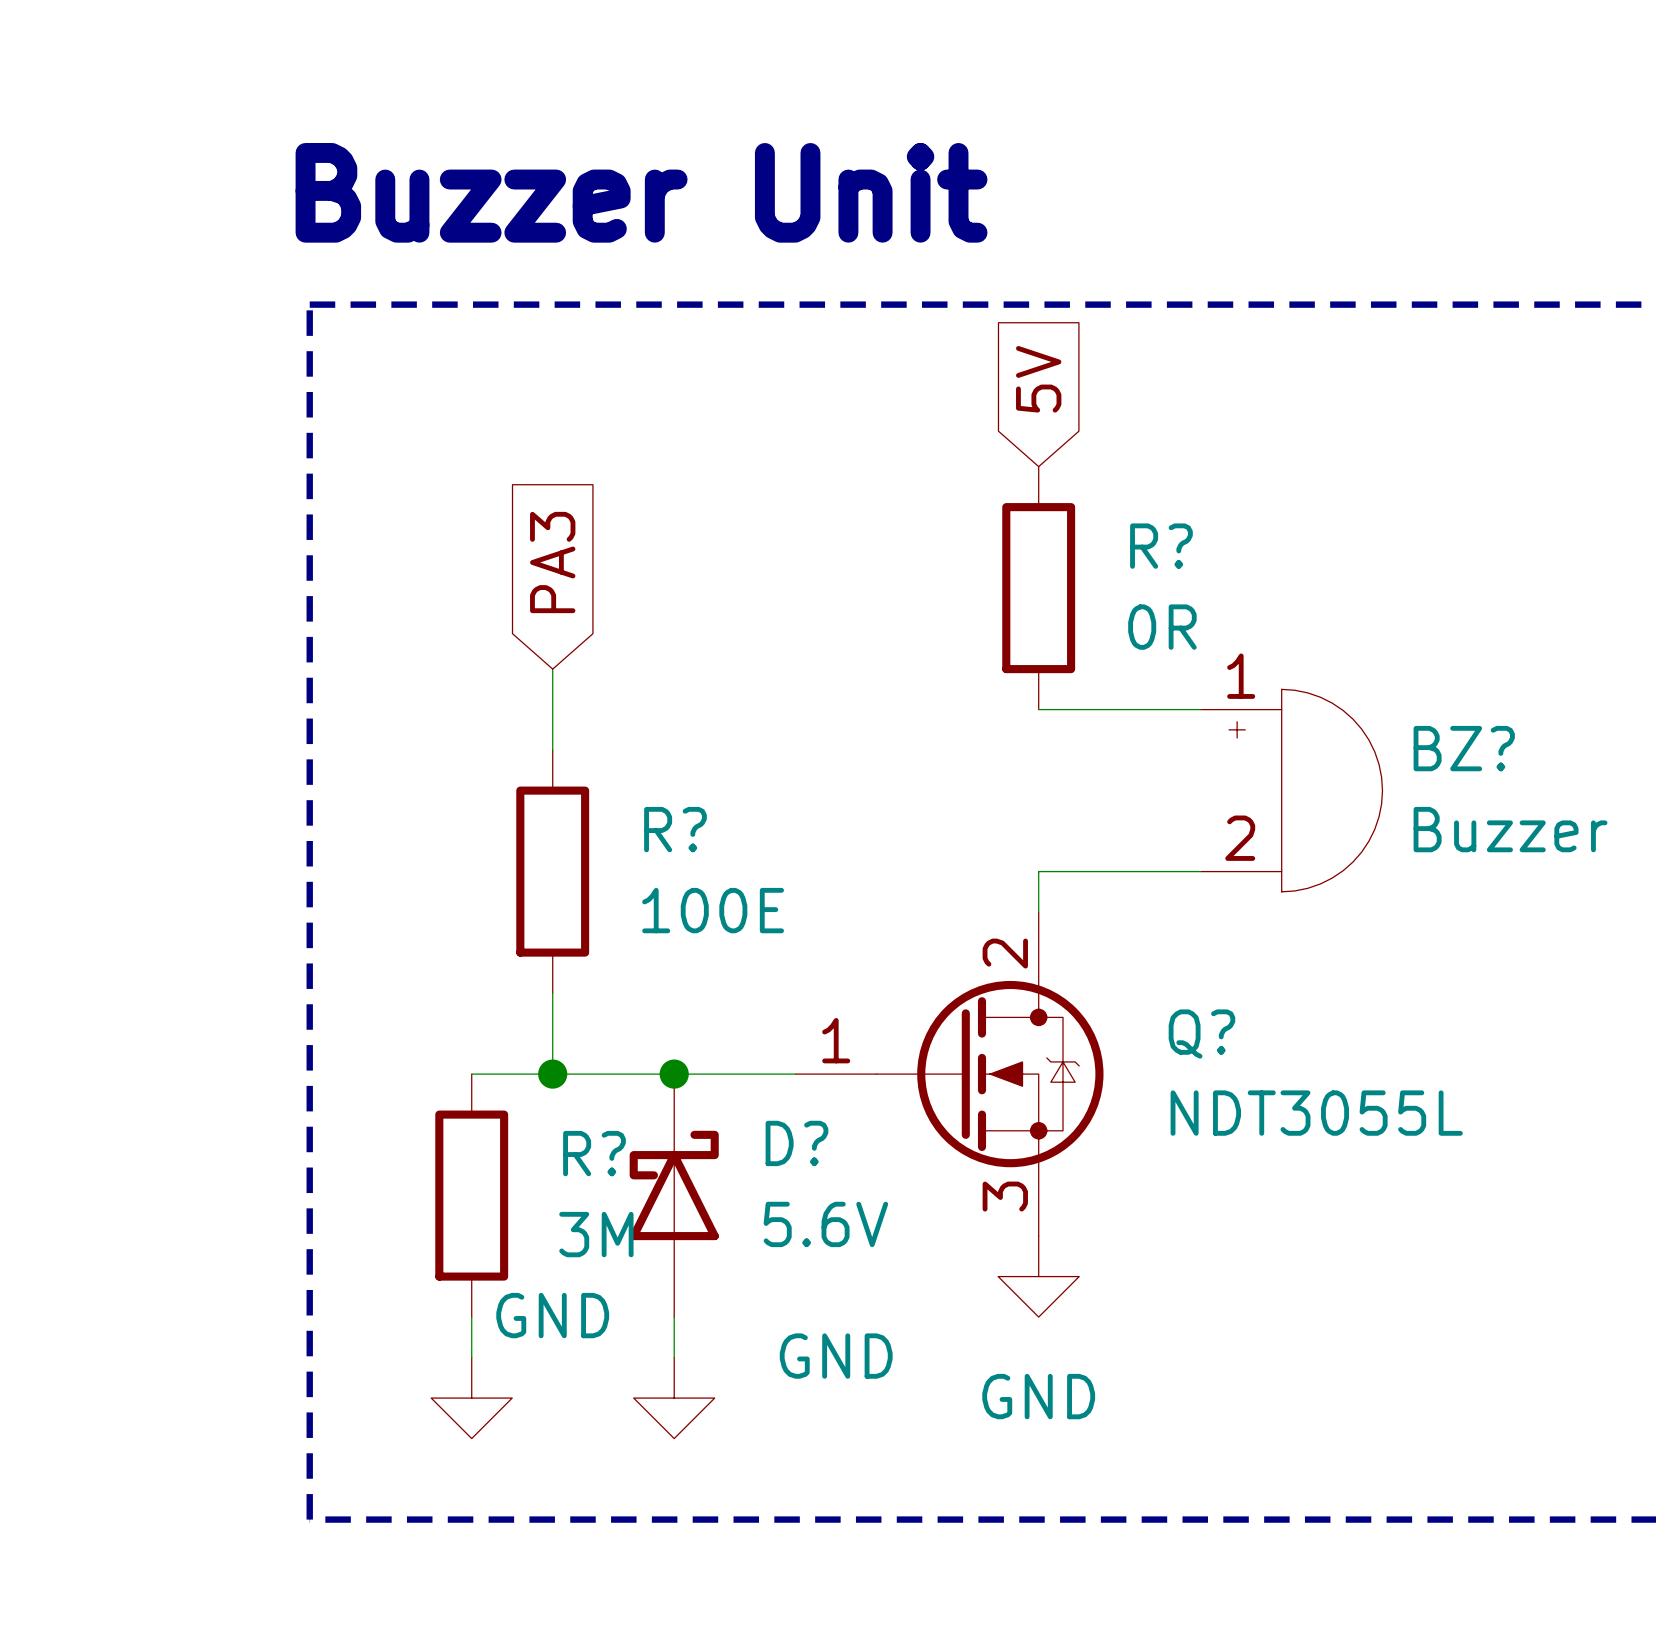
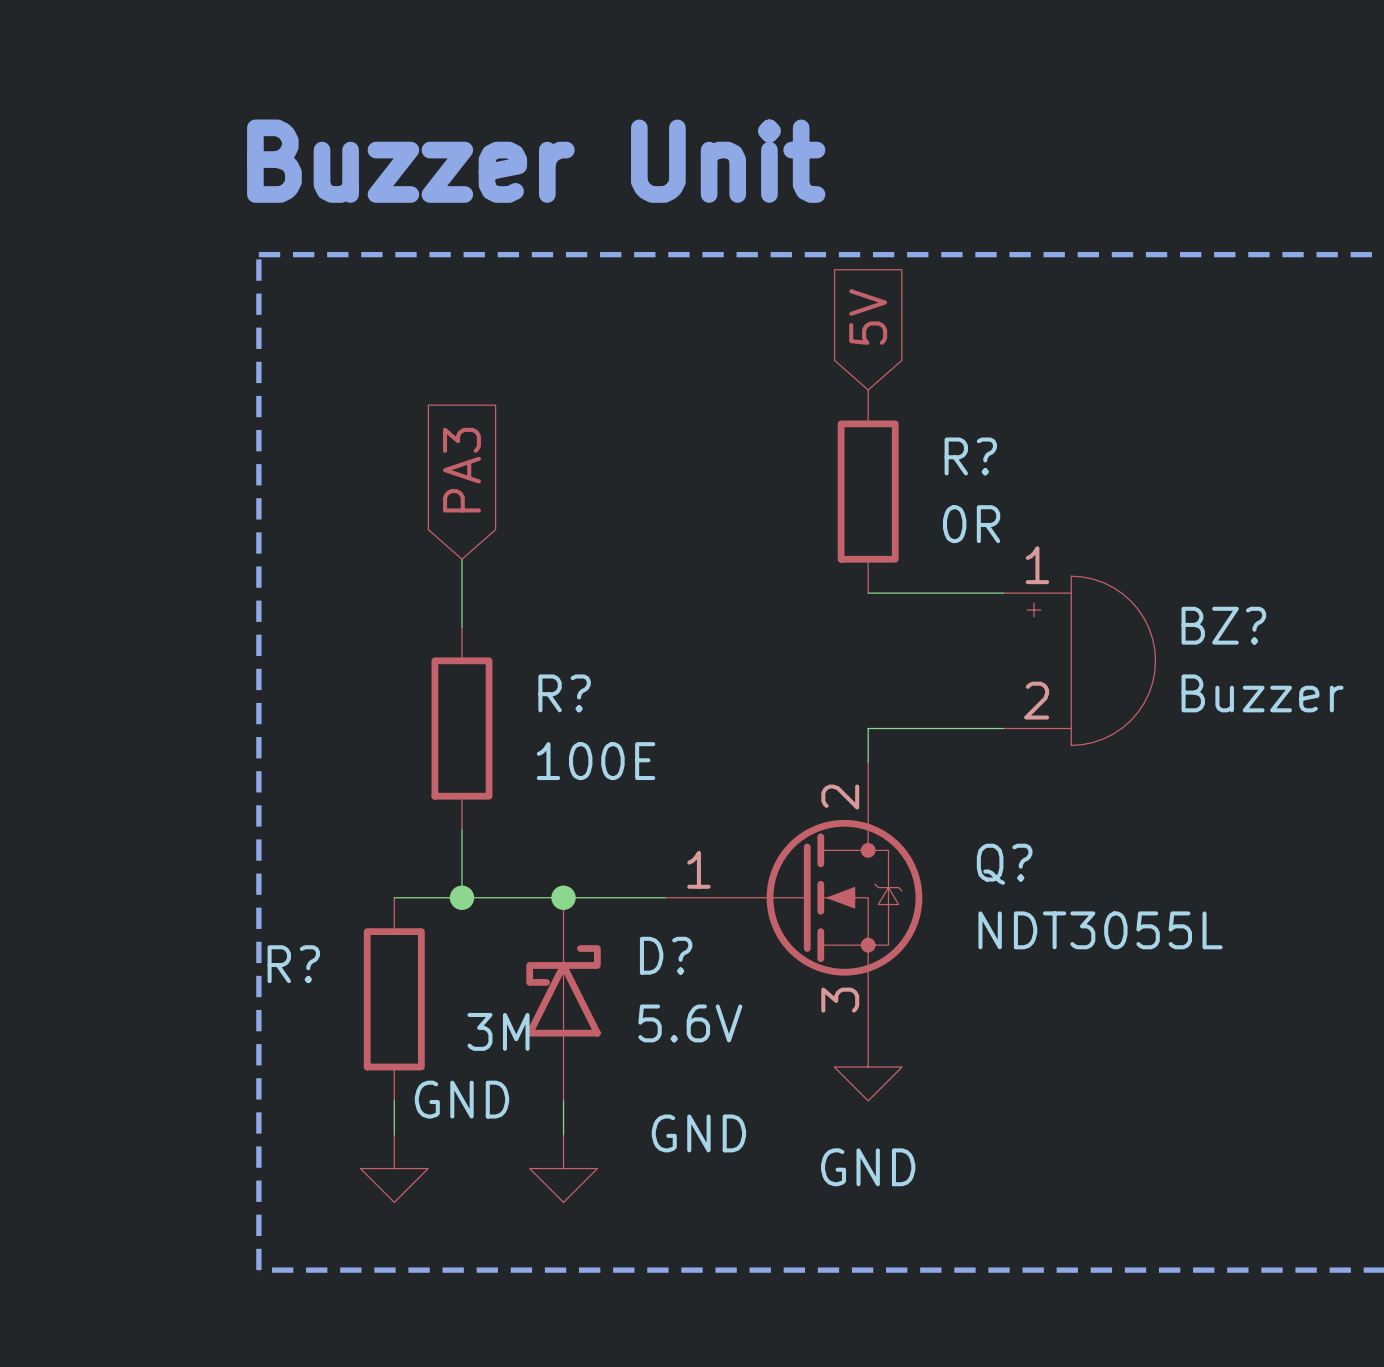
R? name position: R? (594, 1153) -> R? (293, 964)

